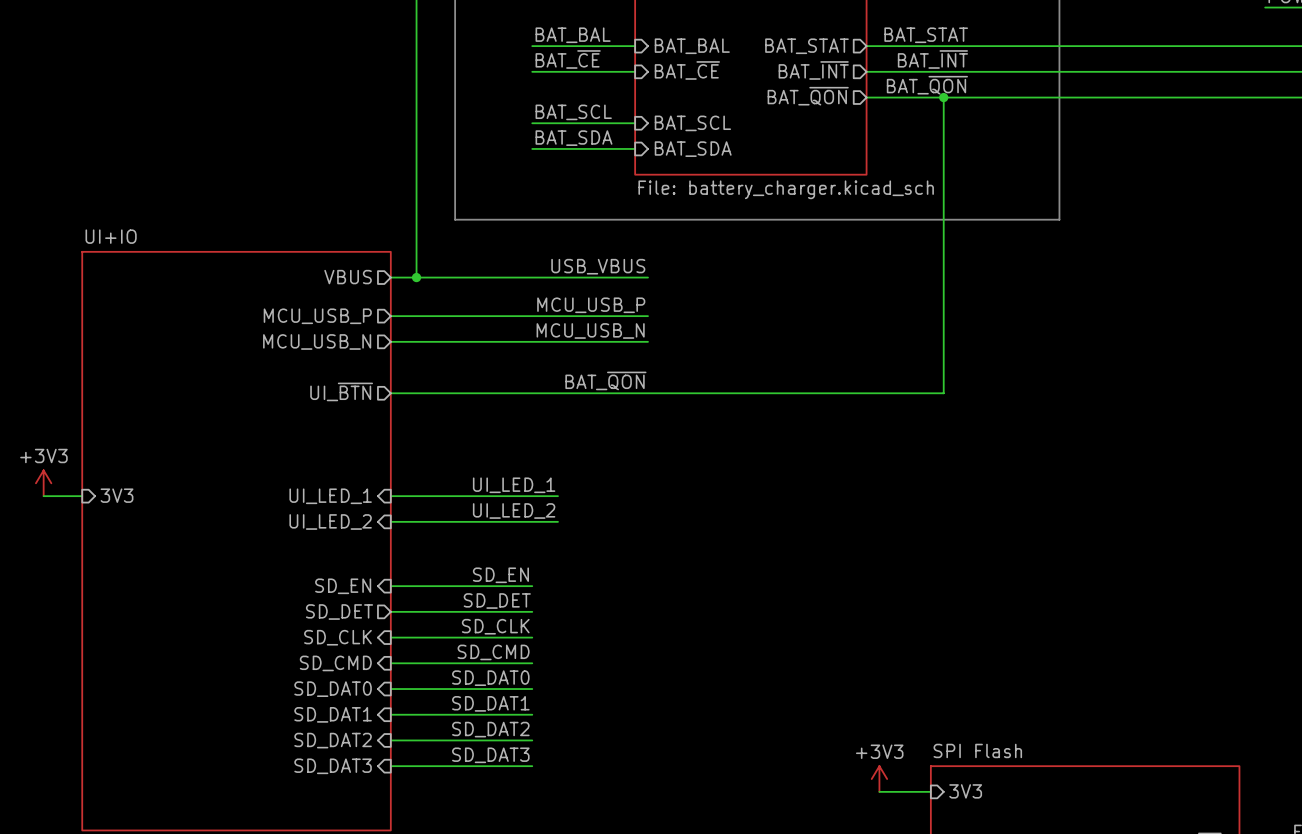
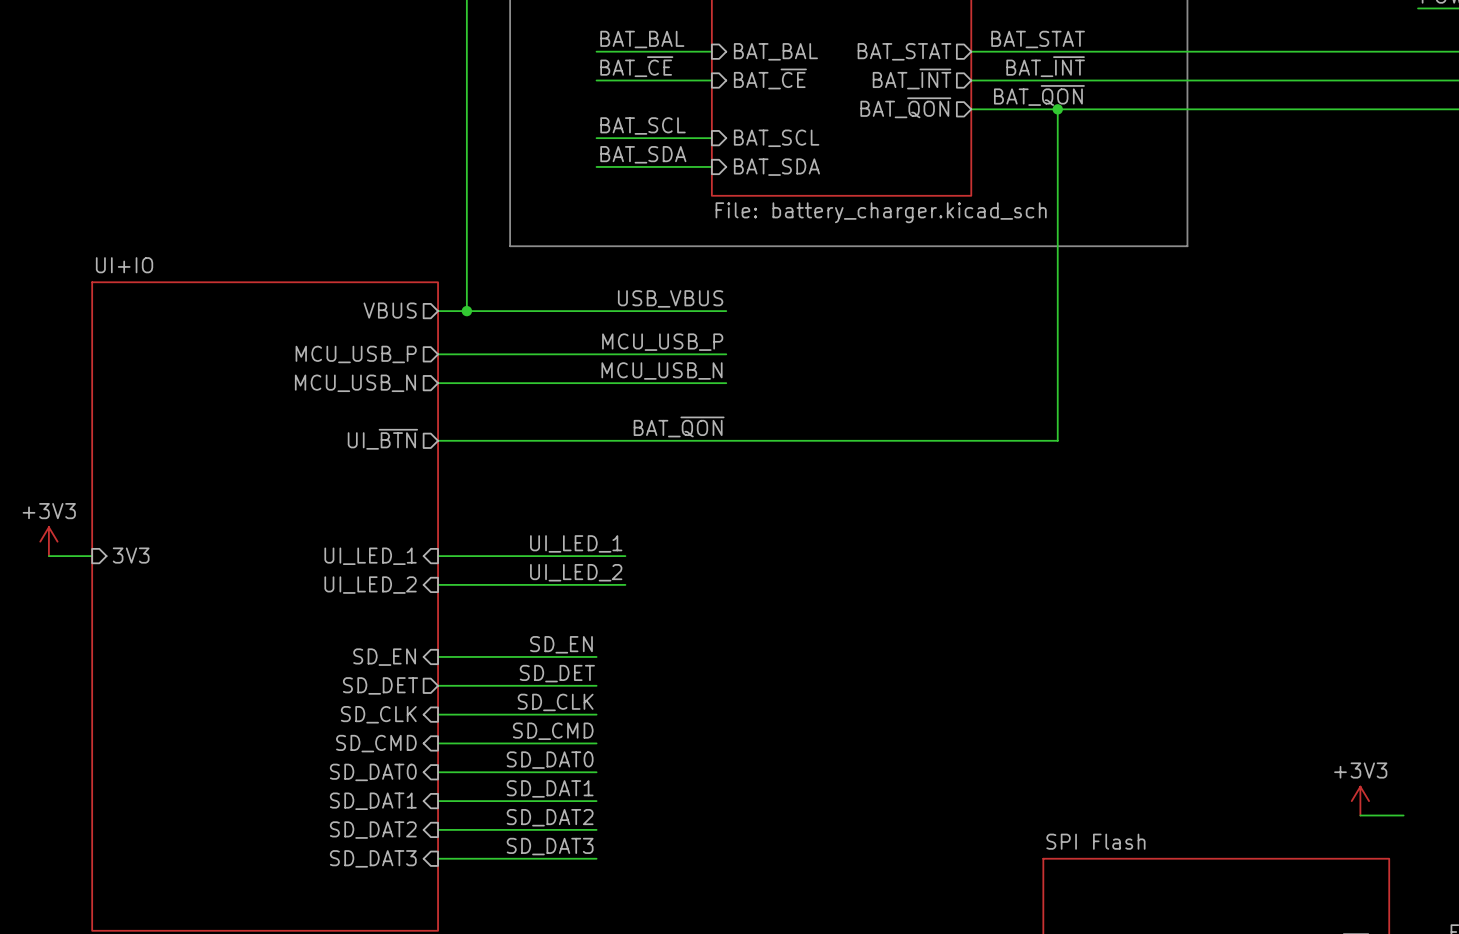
power symbol: none -> +3V3 (1360, 801)
wire: none -> (1360, 815) (1403, 815)
power symbol: +3V3 (879, 779) -> none
wire: (879, 791) (930, 791) -> none
sheet pin: 3V3 (965, 791) -> none

